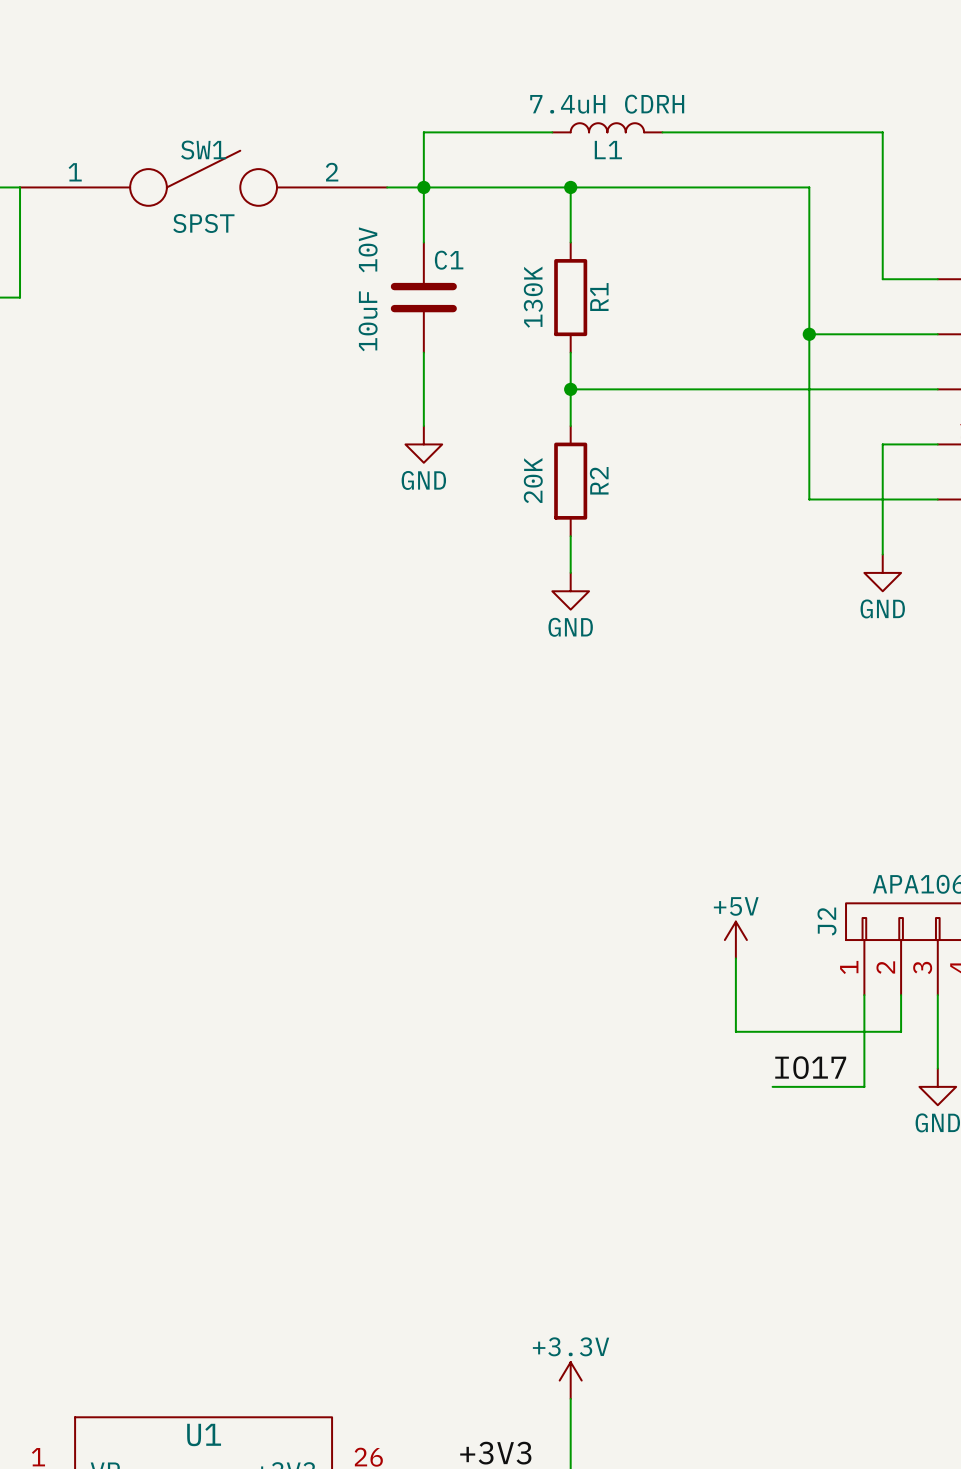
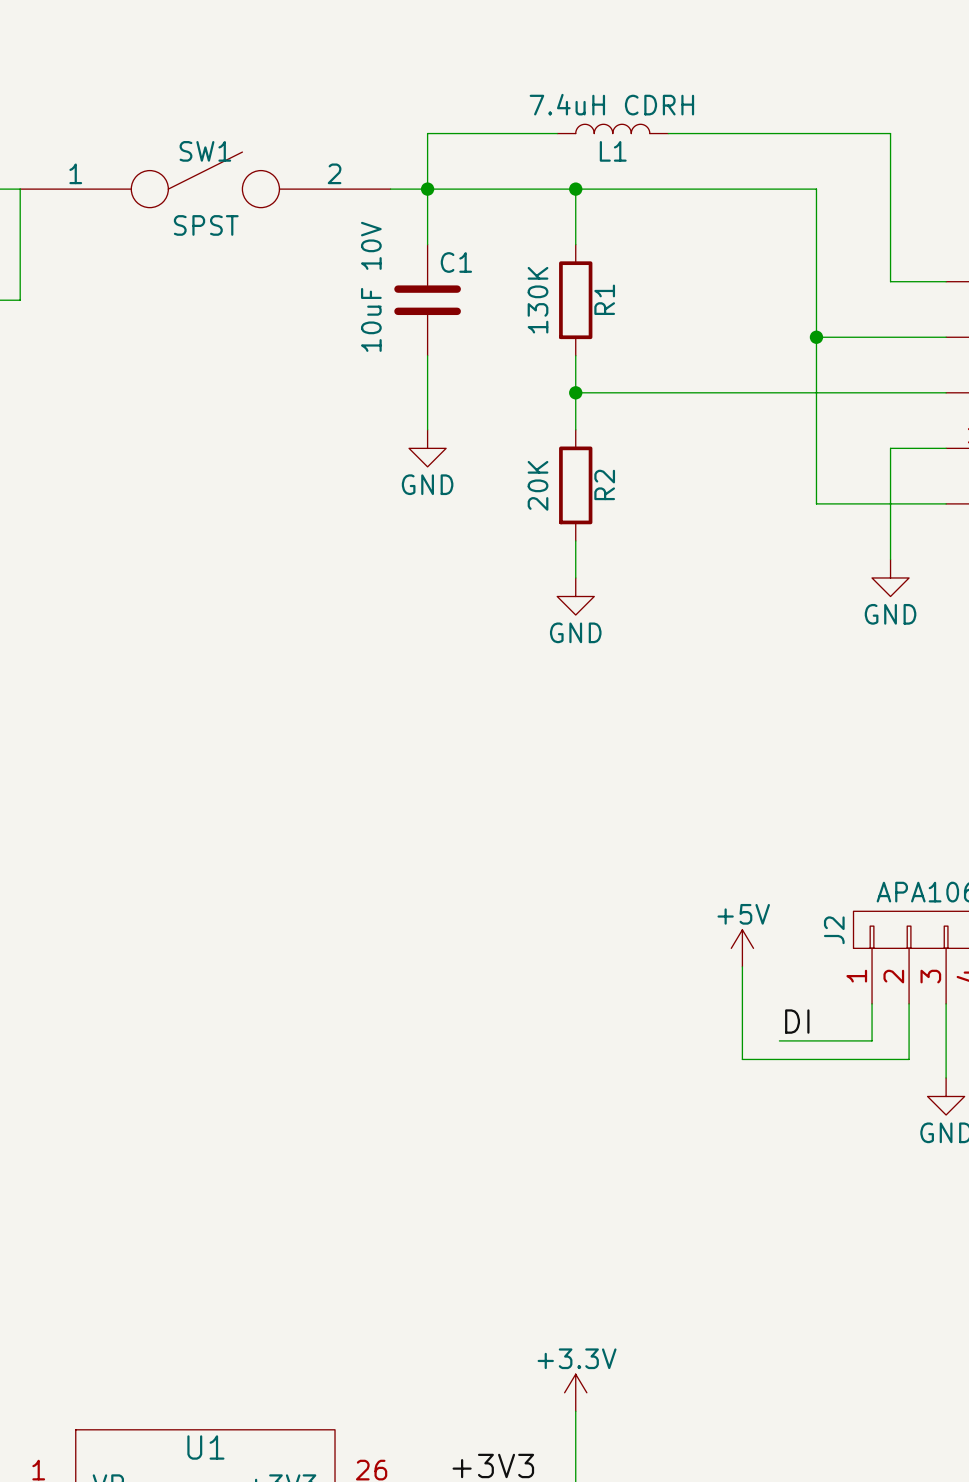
label: none -> DI (797, 1021)
wire: (735, 1031) (772, 1031) -> none
wire: (901, 1031) (864, 1031) (864, 1086) (772, 1086) -> (909, 1040) (909, 1059) (742, 1059) (742, 1040)
label: IO17 (810, 1067) -> none

